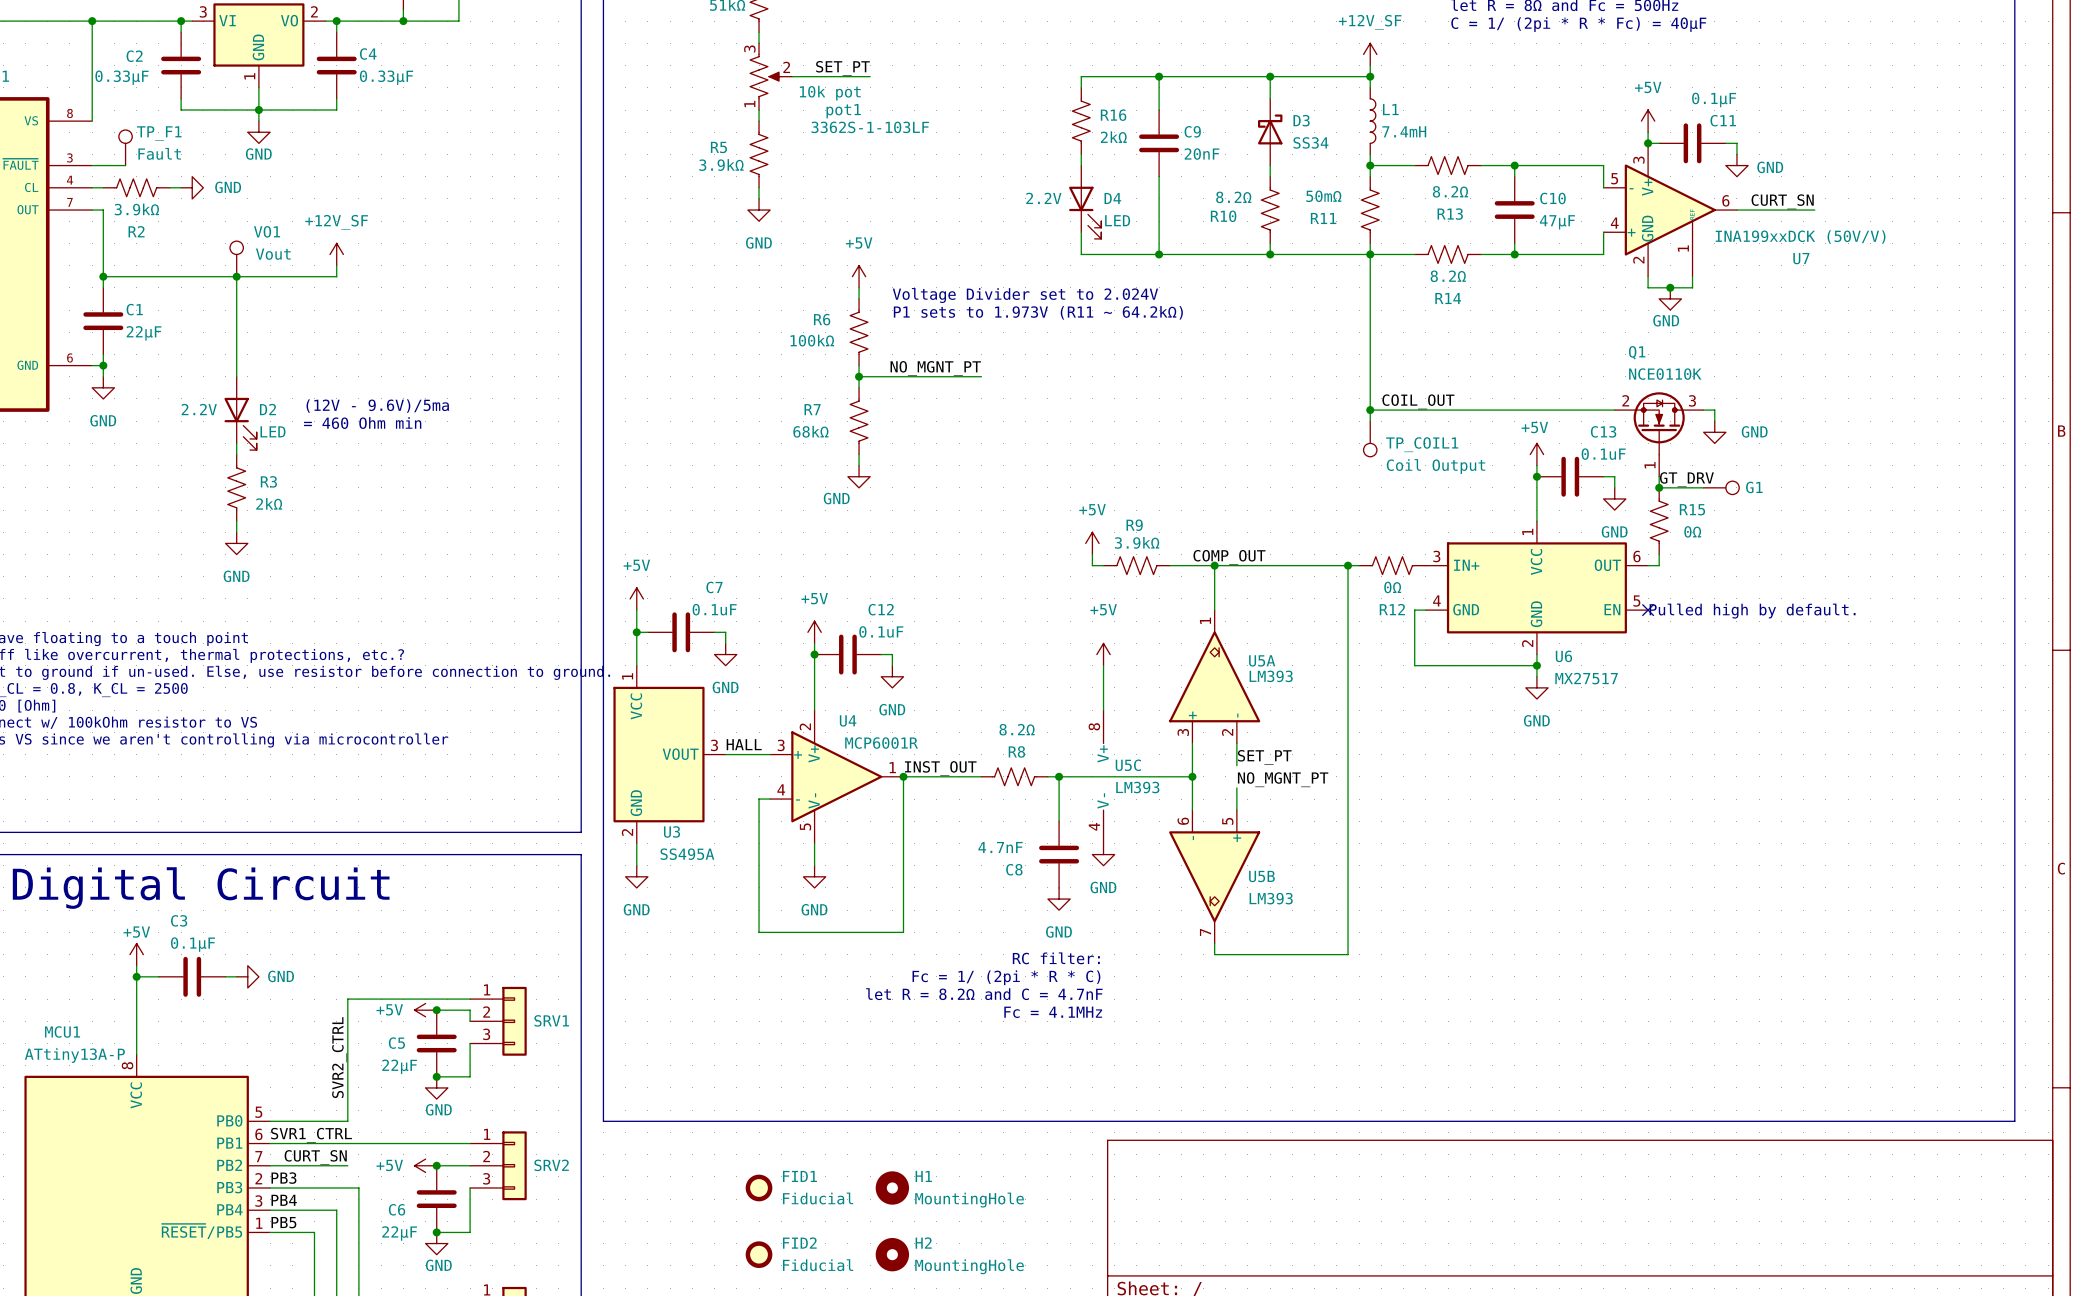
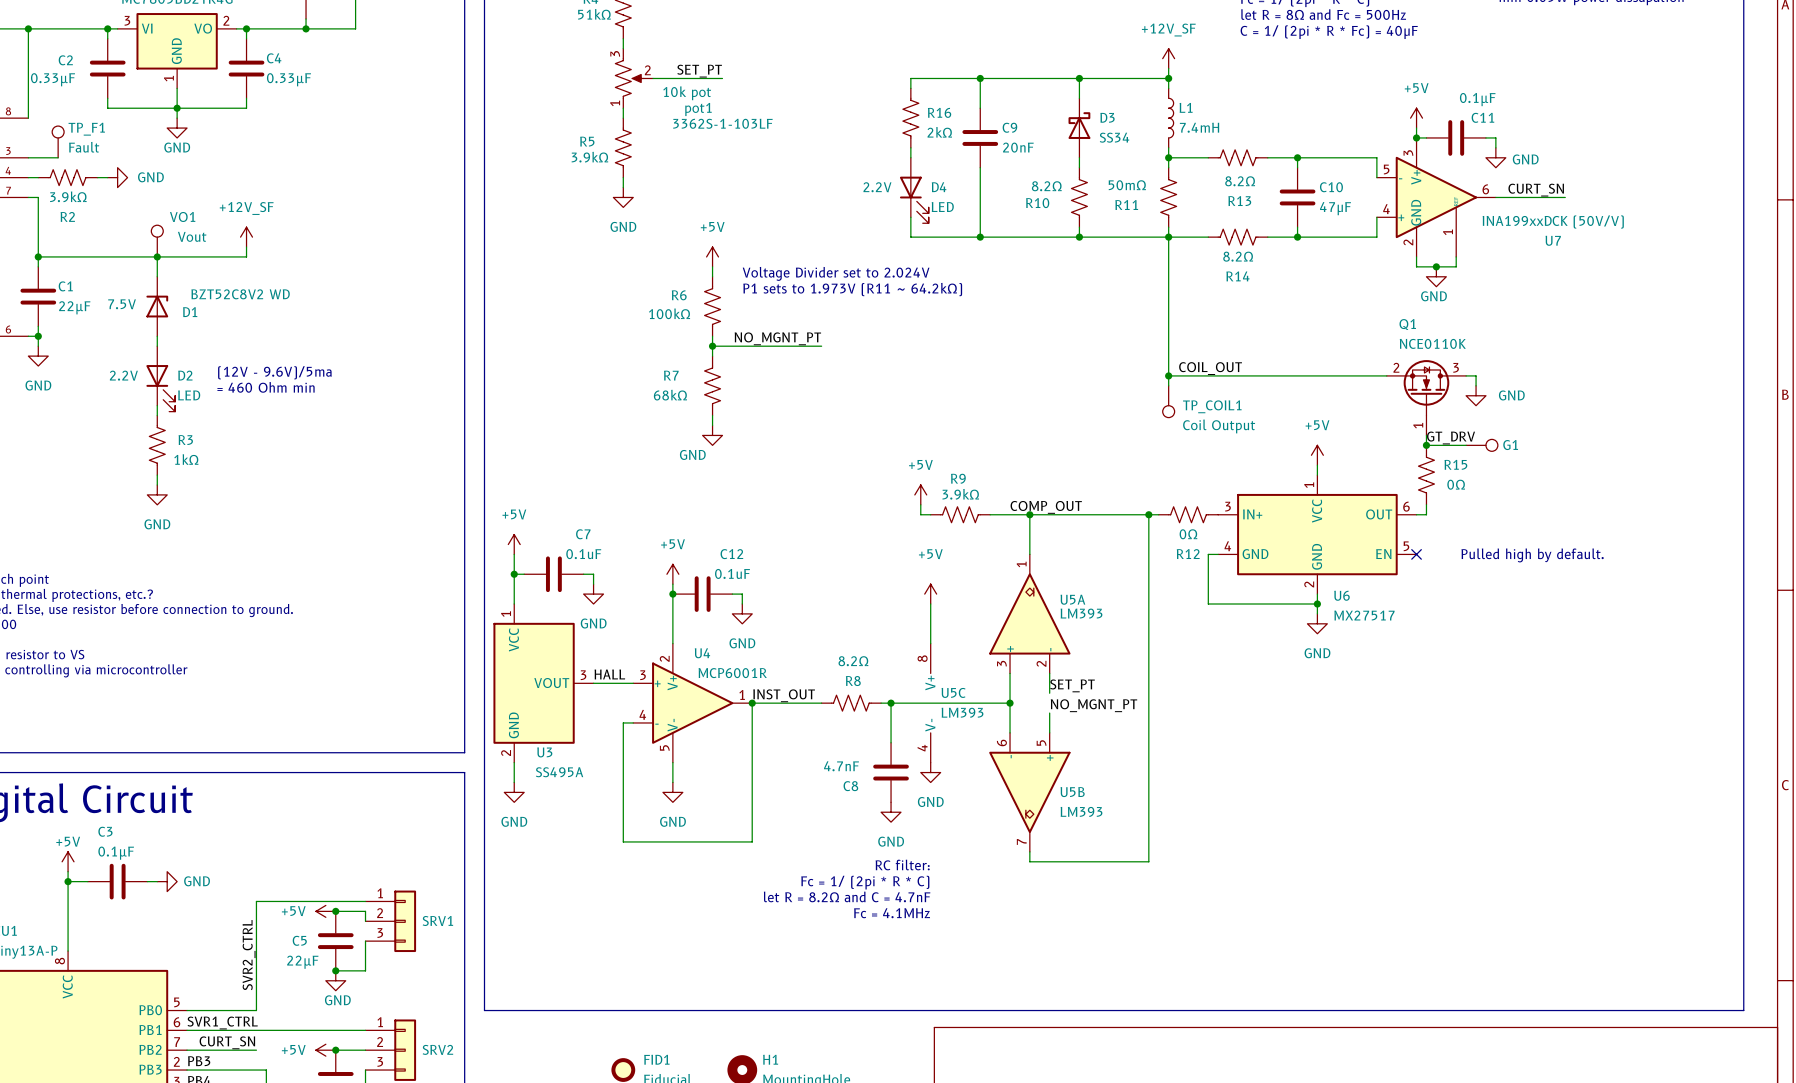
D1: none -> BZT52C8V2 WD (157, 306)
power symbol text position: +5V (1534, 427) -> +5V (1317, 425)
power symbol position: +5V (1536, 454) -> +5V (1317, 455)
junction: (1536, 476) -> none
C13: 0.1uF (1570, 476) -> none
wire: (1603, 476) (1614, 476) (1614, 487) -> none
power symbol: GND (1614, 498) -> none
R3 value: 2kΩ (269, 503) -> 1kΩ (186, 459)

